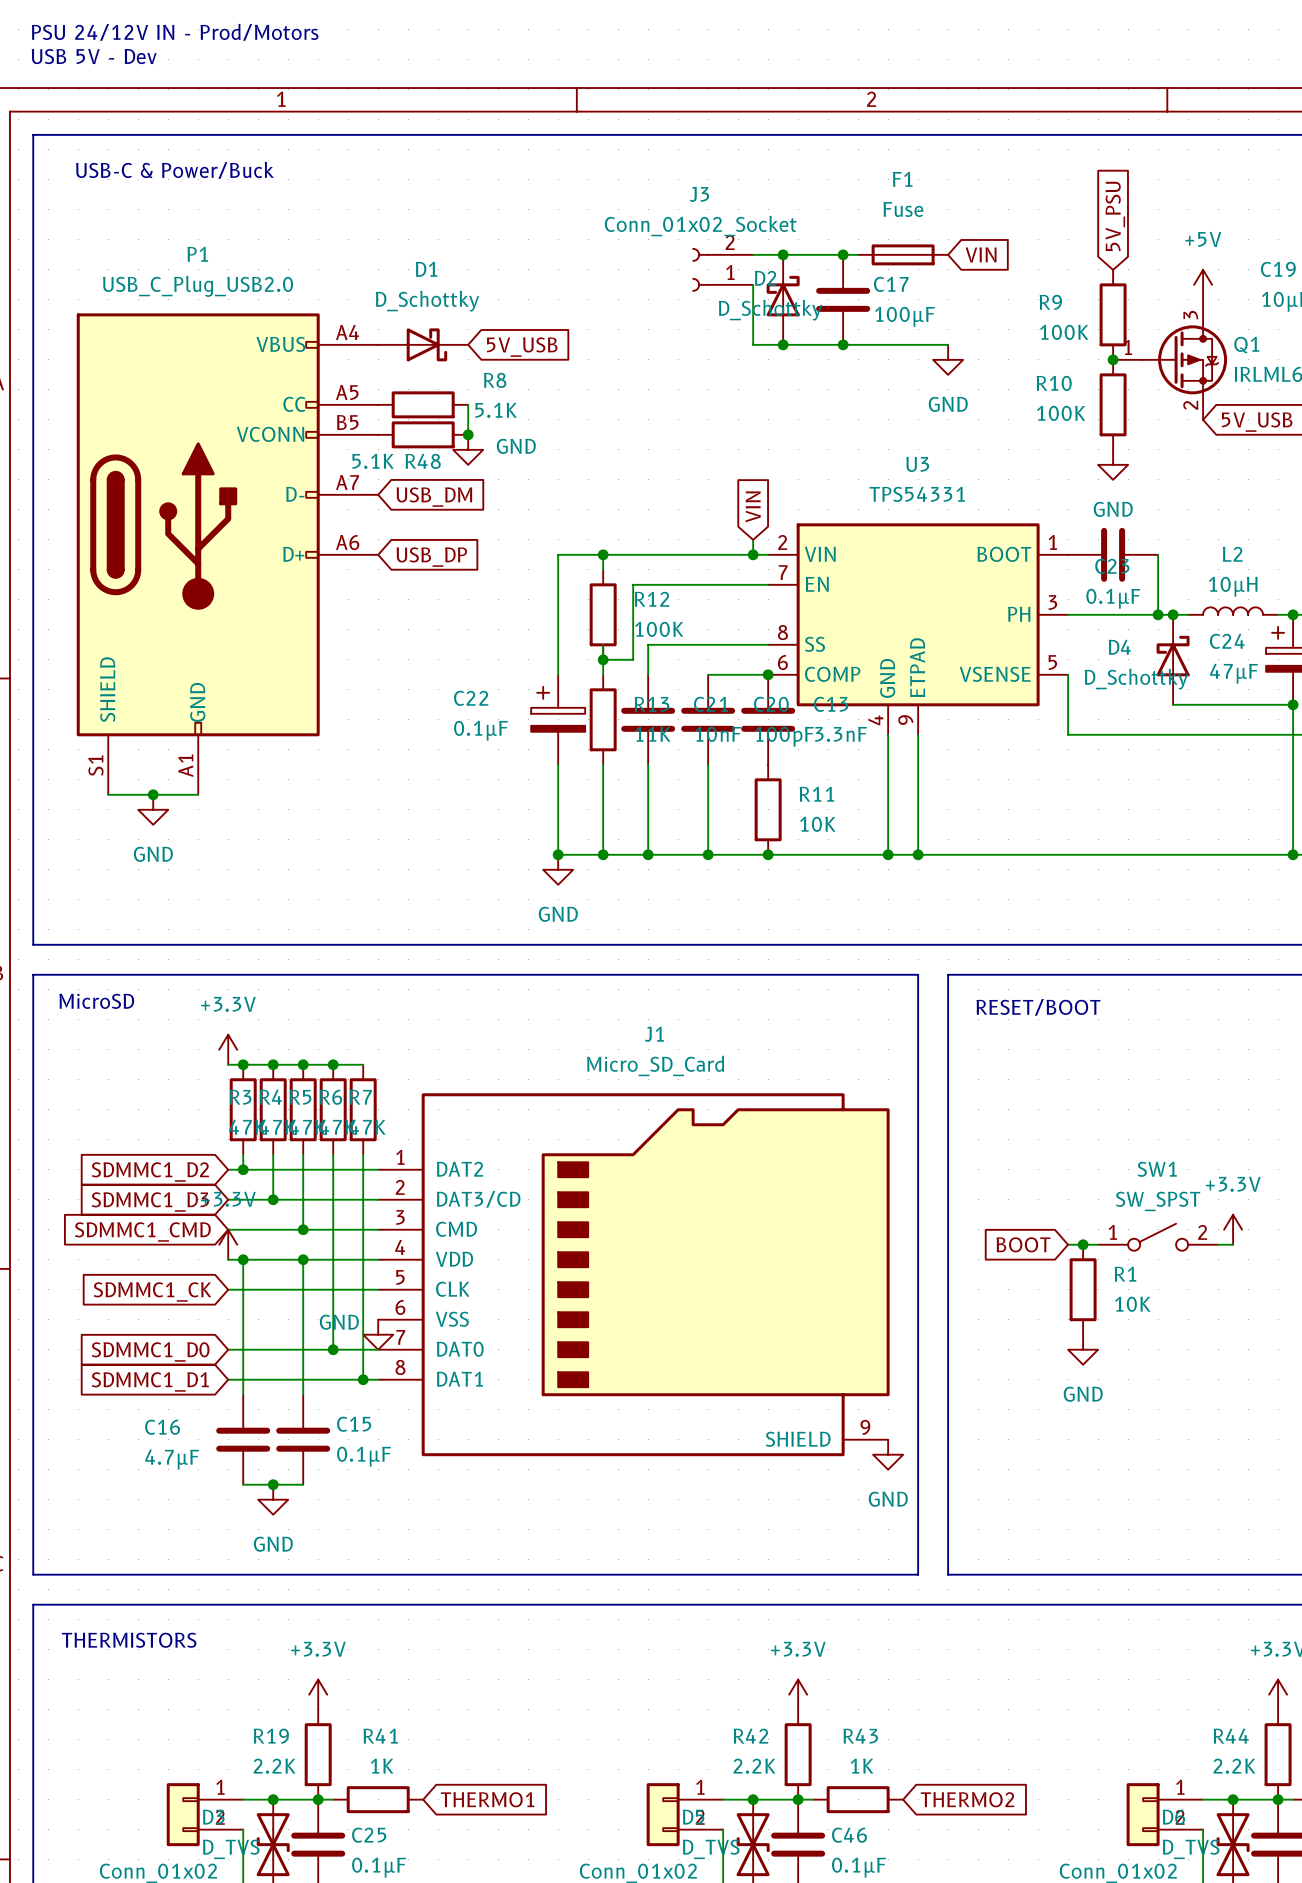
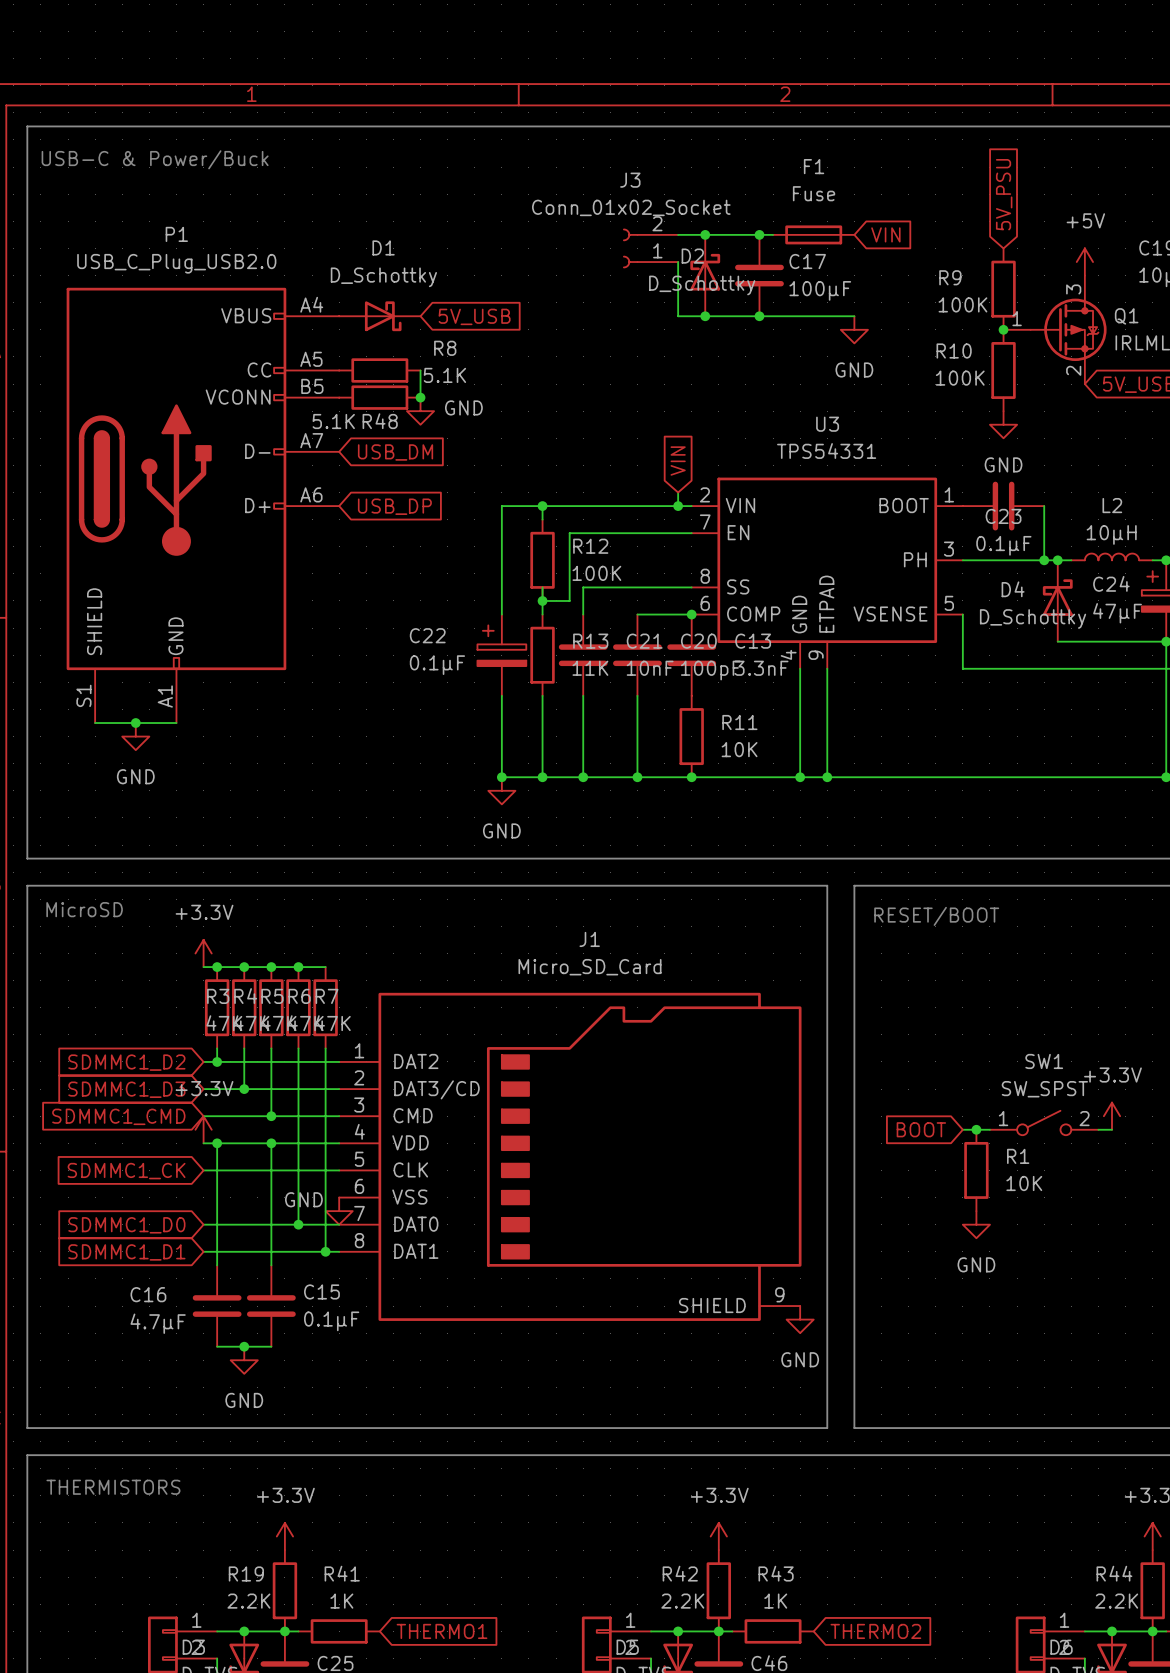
text: PSU 24/12V IN - Prod/Motors (175, 32) -> none
text: USB 5V - Dev (94, 56) -> none

